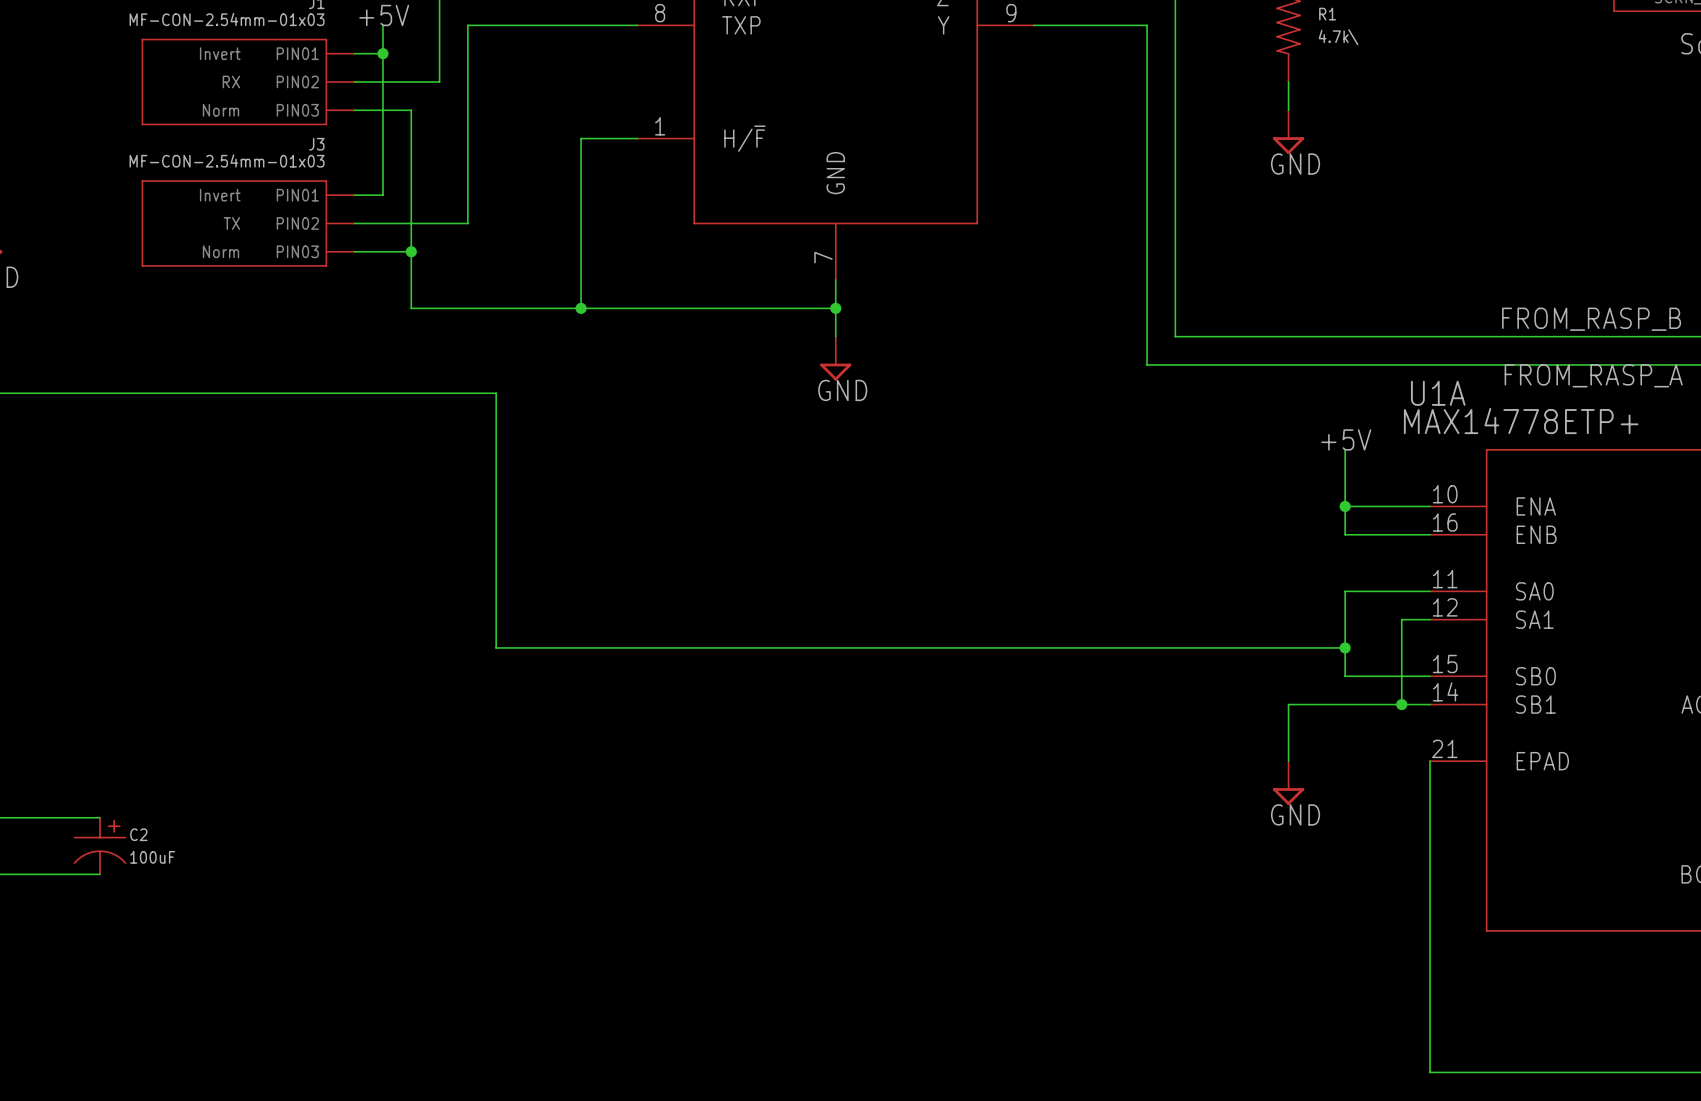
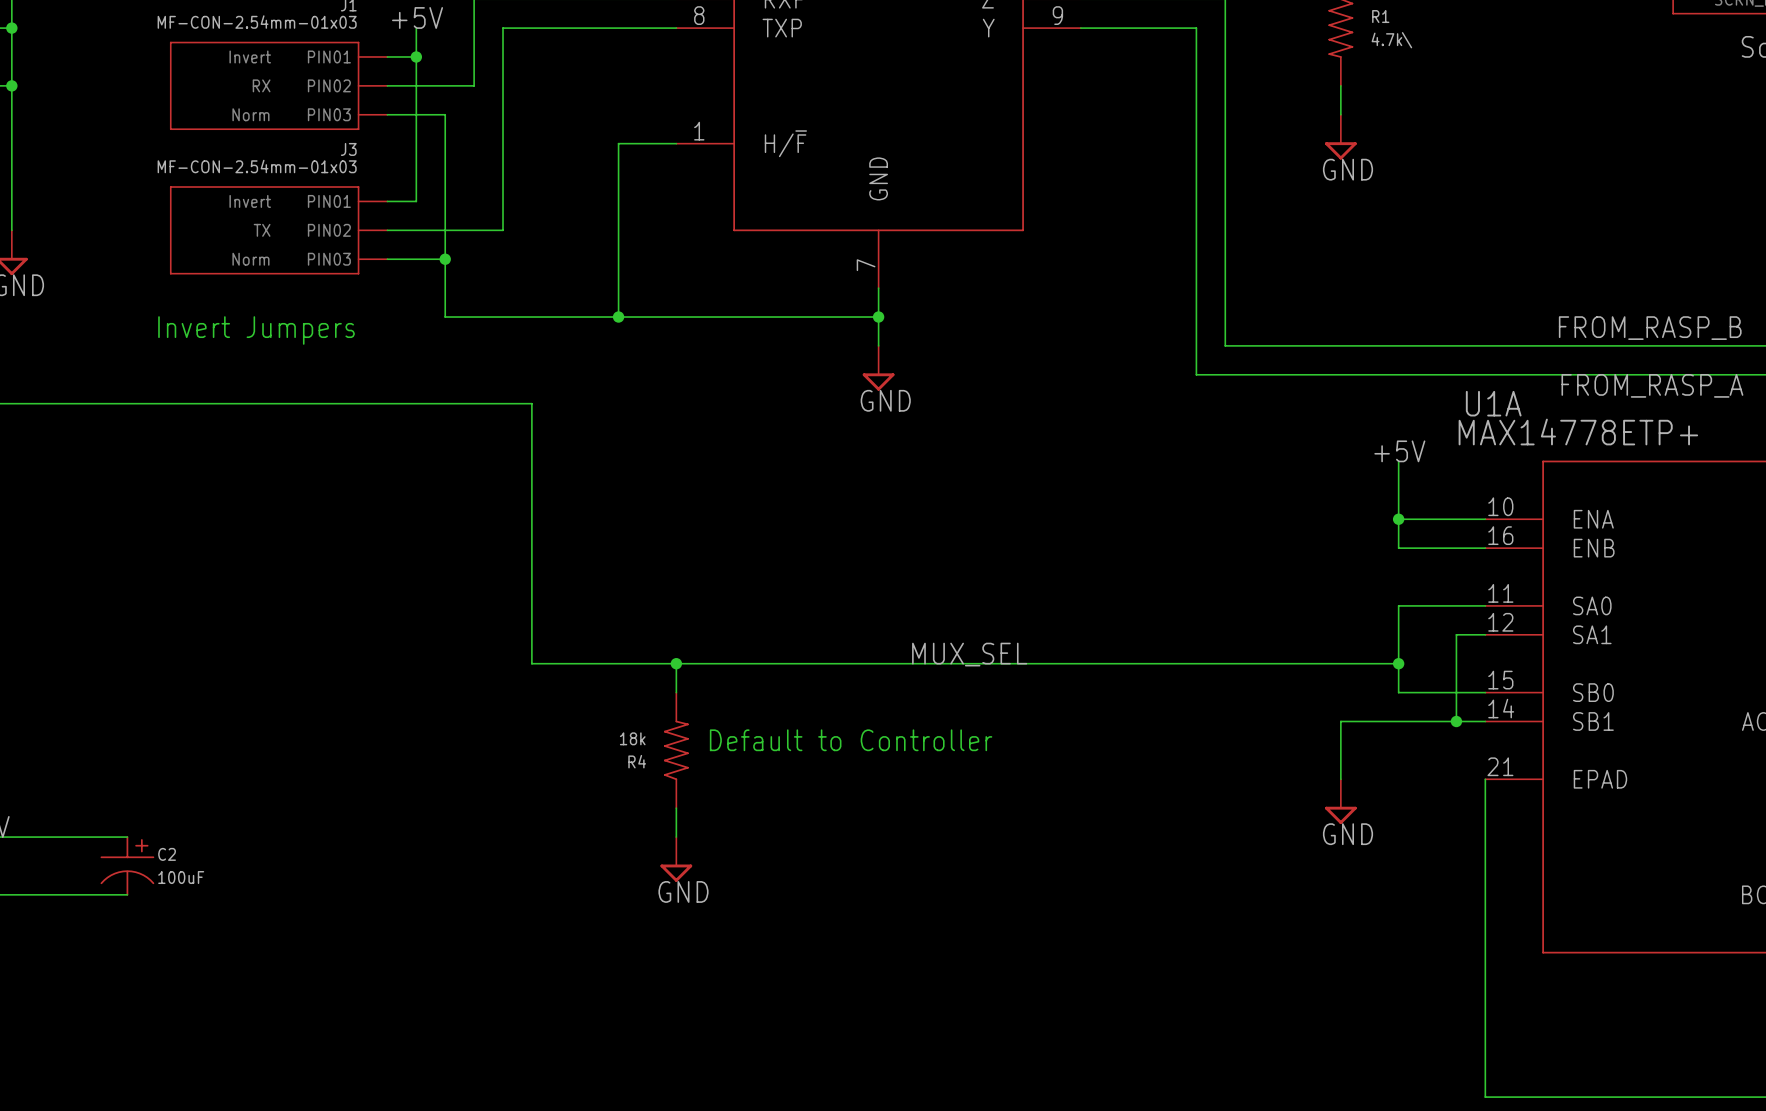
text: none -> Invert Jumpers (256, 330)
label: none -> MUX_SEL (969, 654)
wire: none -> (676, 663) (676, 692)
junction: none -> (676, 663)
text: none -> Default to Controller (851, 740)
R4: none -> 18k (676, 750)
wire: none -> (676, 808) (676, 837)
power symbol: none -> GND (676, 859)

